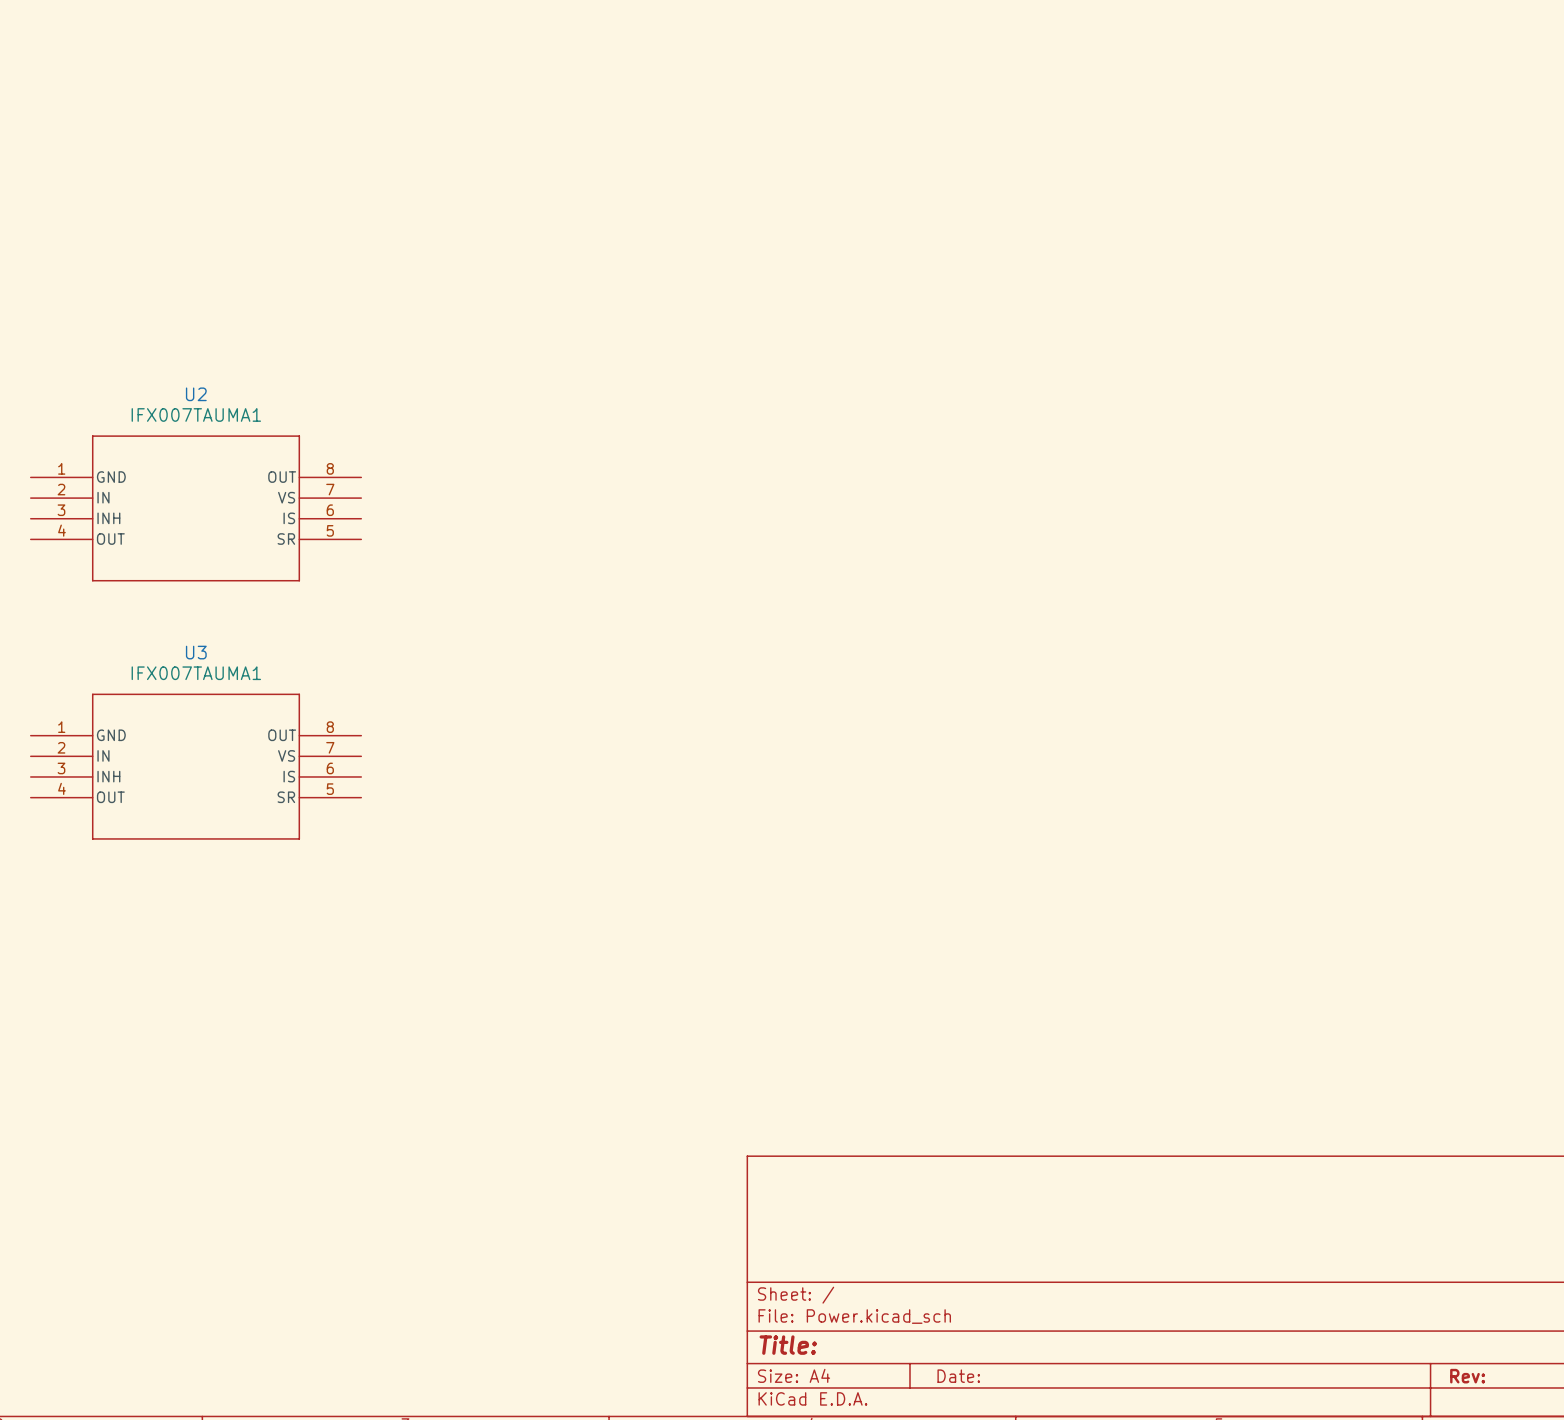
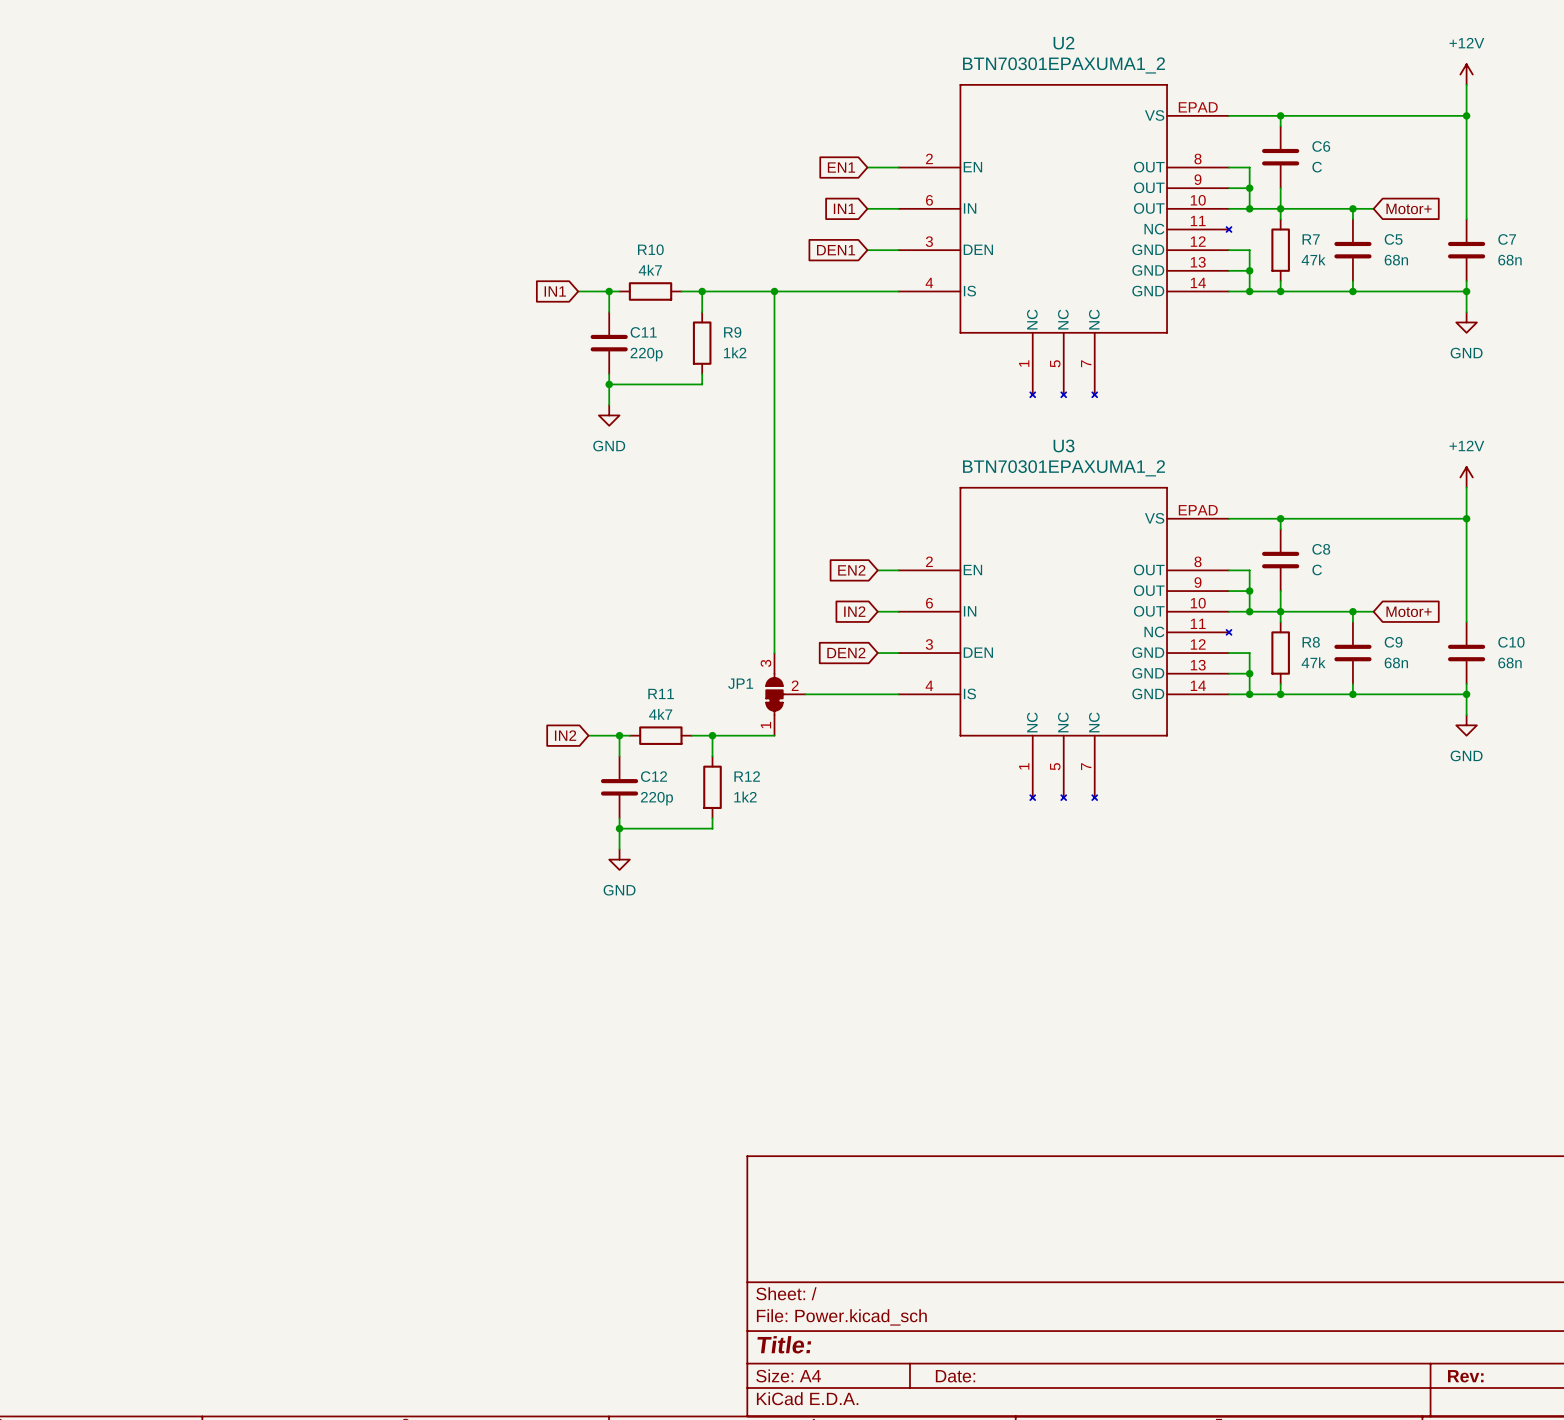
power symbol: none -> +12V (1466, 74)
wire: none -> (1466, 84) (1466, 219)
wire: none -> (1229, 115) (1466, 115)
wire: none -> (1280, 115) (1280, 126)
junction: none -> (1280, 115)
junction: none -> (1466, 115)
C6: none -> C (1280, 157)
global label: none -> EN1 (841, 167)
wire: none -> (867, 167) (898, 167)
wire: none -> (1229, 167) (1249, 167) (1249, 208)
wire: none -> (1229, 188) (1249, 188)
junction: none -> (1249, 188)
wire: none -> (1280, 188) (1280, 219)
global label: none -> IN1 (844, 208)
wire: none -> (867, 208) (898, 208)
wire: none -> (1229, 208) (1373, 208)
junction: none -> (1249, 208)
junction: none -> (1280, 208)
wire: none -> (1352, 208) (1352, 219)
junction: none -> (1352, 208)
global label: none -> Motor+ (1409, 208)
global label: none -> DEN1 (836, 250)
wire: none -> (867, 250) (898, 250)
wire: none -> (1229, 250) (1249, 250) (1249, 291)
R7: none -> 47k (1280, 250)
C5: none -> 68n (1352, 250)
C7: none -> 68n (1466, 250)
wire: none -> (1229, 270) (1249, 270)
junction: none -> (1249, 270)
wire: none -> (1280, 281) (1280, 291)
wire: none -> (1352, 281) (1352, 291)
wire: none -> (1466, 281) (1466, 312)
global label: none -> IN1 (555, 291)
wire: none -> (578, 291) (619, 291)
wire: none -> (609, 291) (609, 312)
junction: none -> (609, 291)
R10: none -> 4k7 (650, 291)
wire: none -> (681, 291) (898, 291)
wire: none -> (702, 291) (702, 312)
junction: none -> (702, 291)
wire: none -> (774, 291) (774, 653)
junction: none -> (774, 291)
wire: none -> (1229, 291) (1466, 291)
junction: none -> (1249, 291)
junction: none -> (1280, 291)
junction: none -> (1352, 291)
junction: none -> (1466, 291)
power symbol: none -> GND (1466, 322)
C11: none -> 220p (609, 343)
R9: none -> 1k2 (702, 343)
wire: none -> (609, 374) (609, 405)
wire: none -> (702, 374) (702, 384) (609, 384)
junction: none -> (609, 384)
U2 name position: U2 (196, 394) -> U2 (1063, 43)
U2 value: IFX007TAUMA1 (196, 414) -> BTN70301EPAXUMA1_2 (1064, 65)
power symbol: none -> GND (609, 415)
U2 symbol: [30, 435, 362, 582] -> [898, 84, 1232, 398]
power symbol: none -> +12V (1466, 477)
wire: none -> (1466, 487) (1466, 622)
wire: none -> (1229, 518) (1466, 518)
wire: none -> (1280, 518) (1280, 529)
junction: none -> (1280, 518)
junction: none -> (1466, 518)
C8: none -> C (1280, 560)
global label: none -> EN2 (851, 570)
wire: none -> (877, 570) (898, 570)
wire: none -> (1229, 570) (1249, 570) (1249, 611)
wire: none -> (1229, 591) (1249, 591)
junction: none -> (1249, 591)
wire: none -> (1280, 591) (1280, 622)
global label: none -> IN2 (854, 611)
wire: none -> (877, 611) (898, 611)
wire: none -> (1229, 611) (1373, 611)
junction: none -> (1249, 611)
junction: none -> (1280, 611)
wire: none -> (1352, 611) (1352, 622)
junction: none -> (1352, 611)
global label: none -> Motor+ (1409, 611)
U3 name position: U3 (196, 652) -> U3 (1064, 445)
global label: none -> DEN2 (846, 652)
wire: none -> (877, 653) (898, 653)
wire: none -> (1229, 653) (1249, 653) (1249, 694)
R8: none -> 47k (1280, 653)
C9: none -> 68n (1352, 653)
C10: none -> 68n (1466, 653)
U3 value: IFX007TAUMA1 (196, 673) -> BTN70301EPAXUMA1_2 (1064, 468)
wire: none -> (1229, 673) (1249, 673)
junction: none -> (1249, 673)
wire: none -> (1280, 684) (1280, 694)
wire: none -> (1352, 684) (1352, 694)
wire: none -> (1466, 684) (1466, 715)
U3 symbol: [30, 693, 362, 840] -> [898, 487, 1232, 801]
JP1: none -> (785, 694)
wire: none -> (805, 694) (898, 694)
wire: none -> (1229, 694) (1466, 694)
junction: none -> (1249, 694)
junction: none -> (1280, 694)
junction: none -> (1352, 694)
junction: none -> (1466, 694)
power symbol: none -> GND (1466, 725)
global label: none -> IN2 (565, 735)
wire: none -> (588, 735) (629, 735)
wire: none -> (619, 735) (619, 756)
junction: none -> (619, 735)
R11: none -> 4k7 (660, 735)
wire: none -> (691, 735) (774, 735)
wire: none -> (712, 735) (712, 756)
junction: none -> (712, 735)
C12: none -> 220p (619, 787)
R12: none -> 1k2 (712, 787)
wire: none -> (619, 818) (619, 849)
wire: none -> (712, 818) (712, 828) (619, 828)
junction: none -> (619, 828)
power symbol: none -> GND (619, 859)

